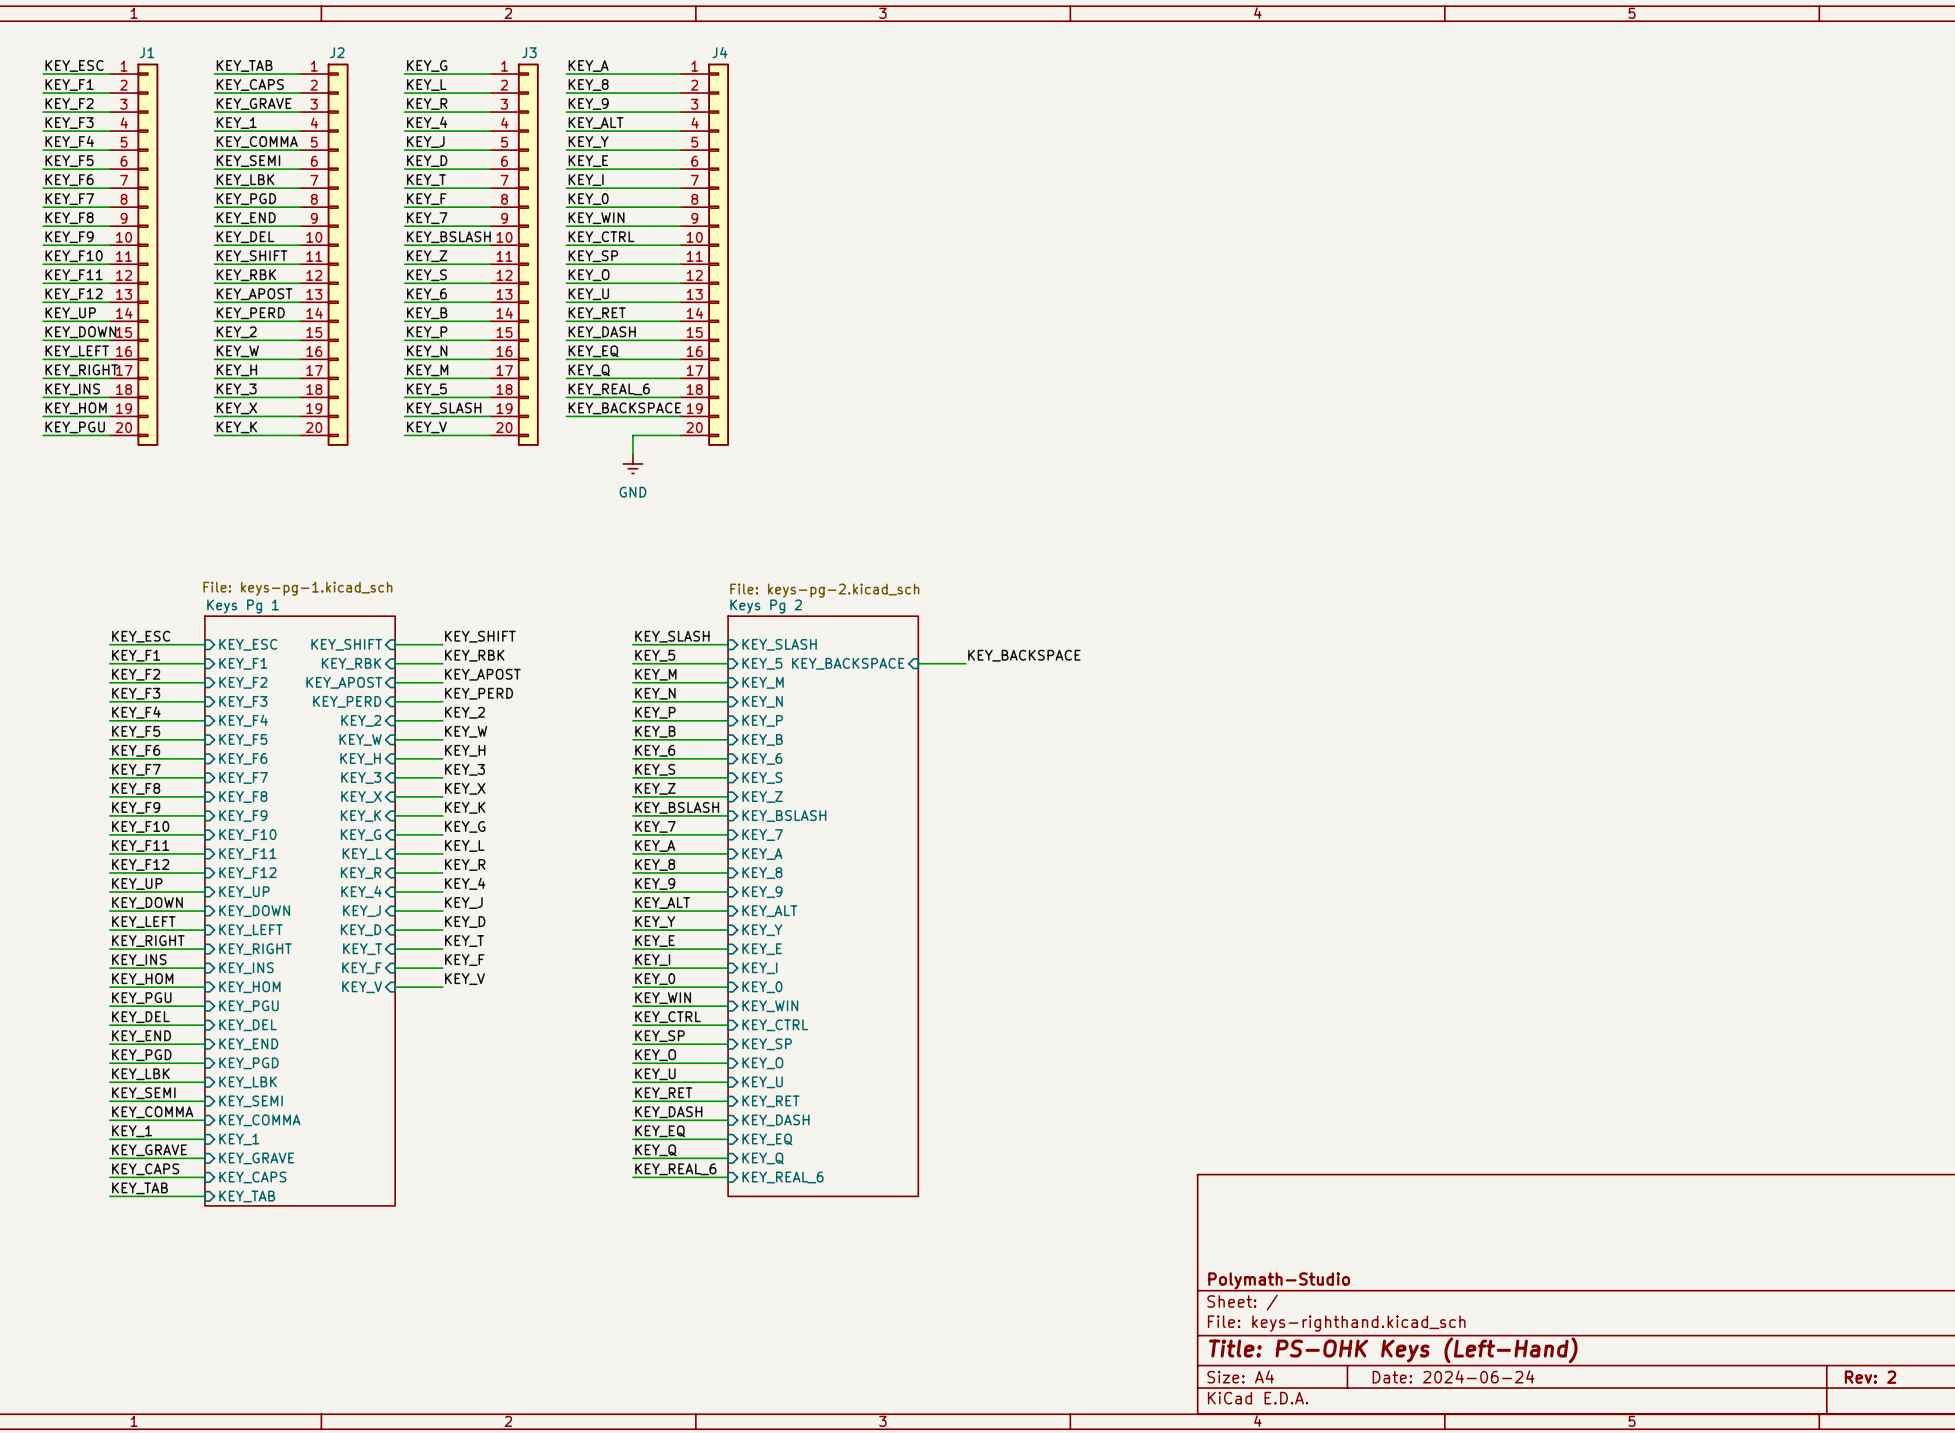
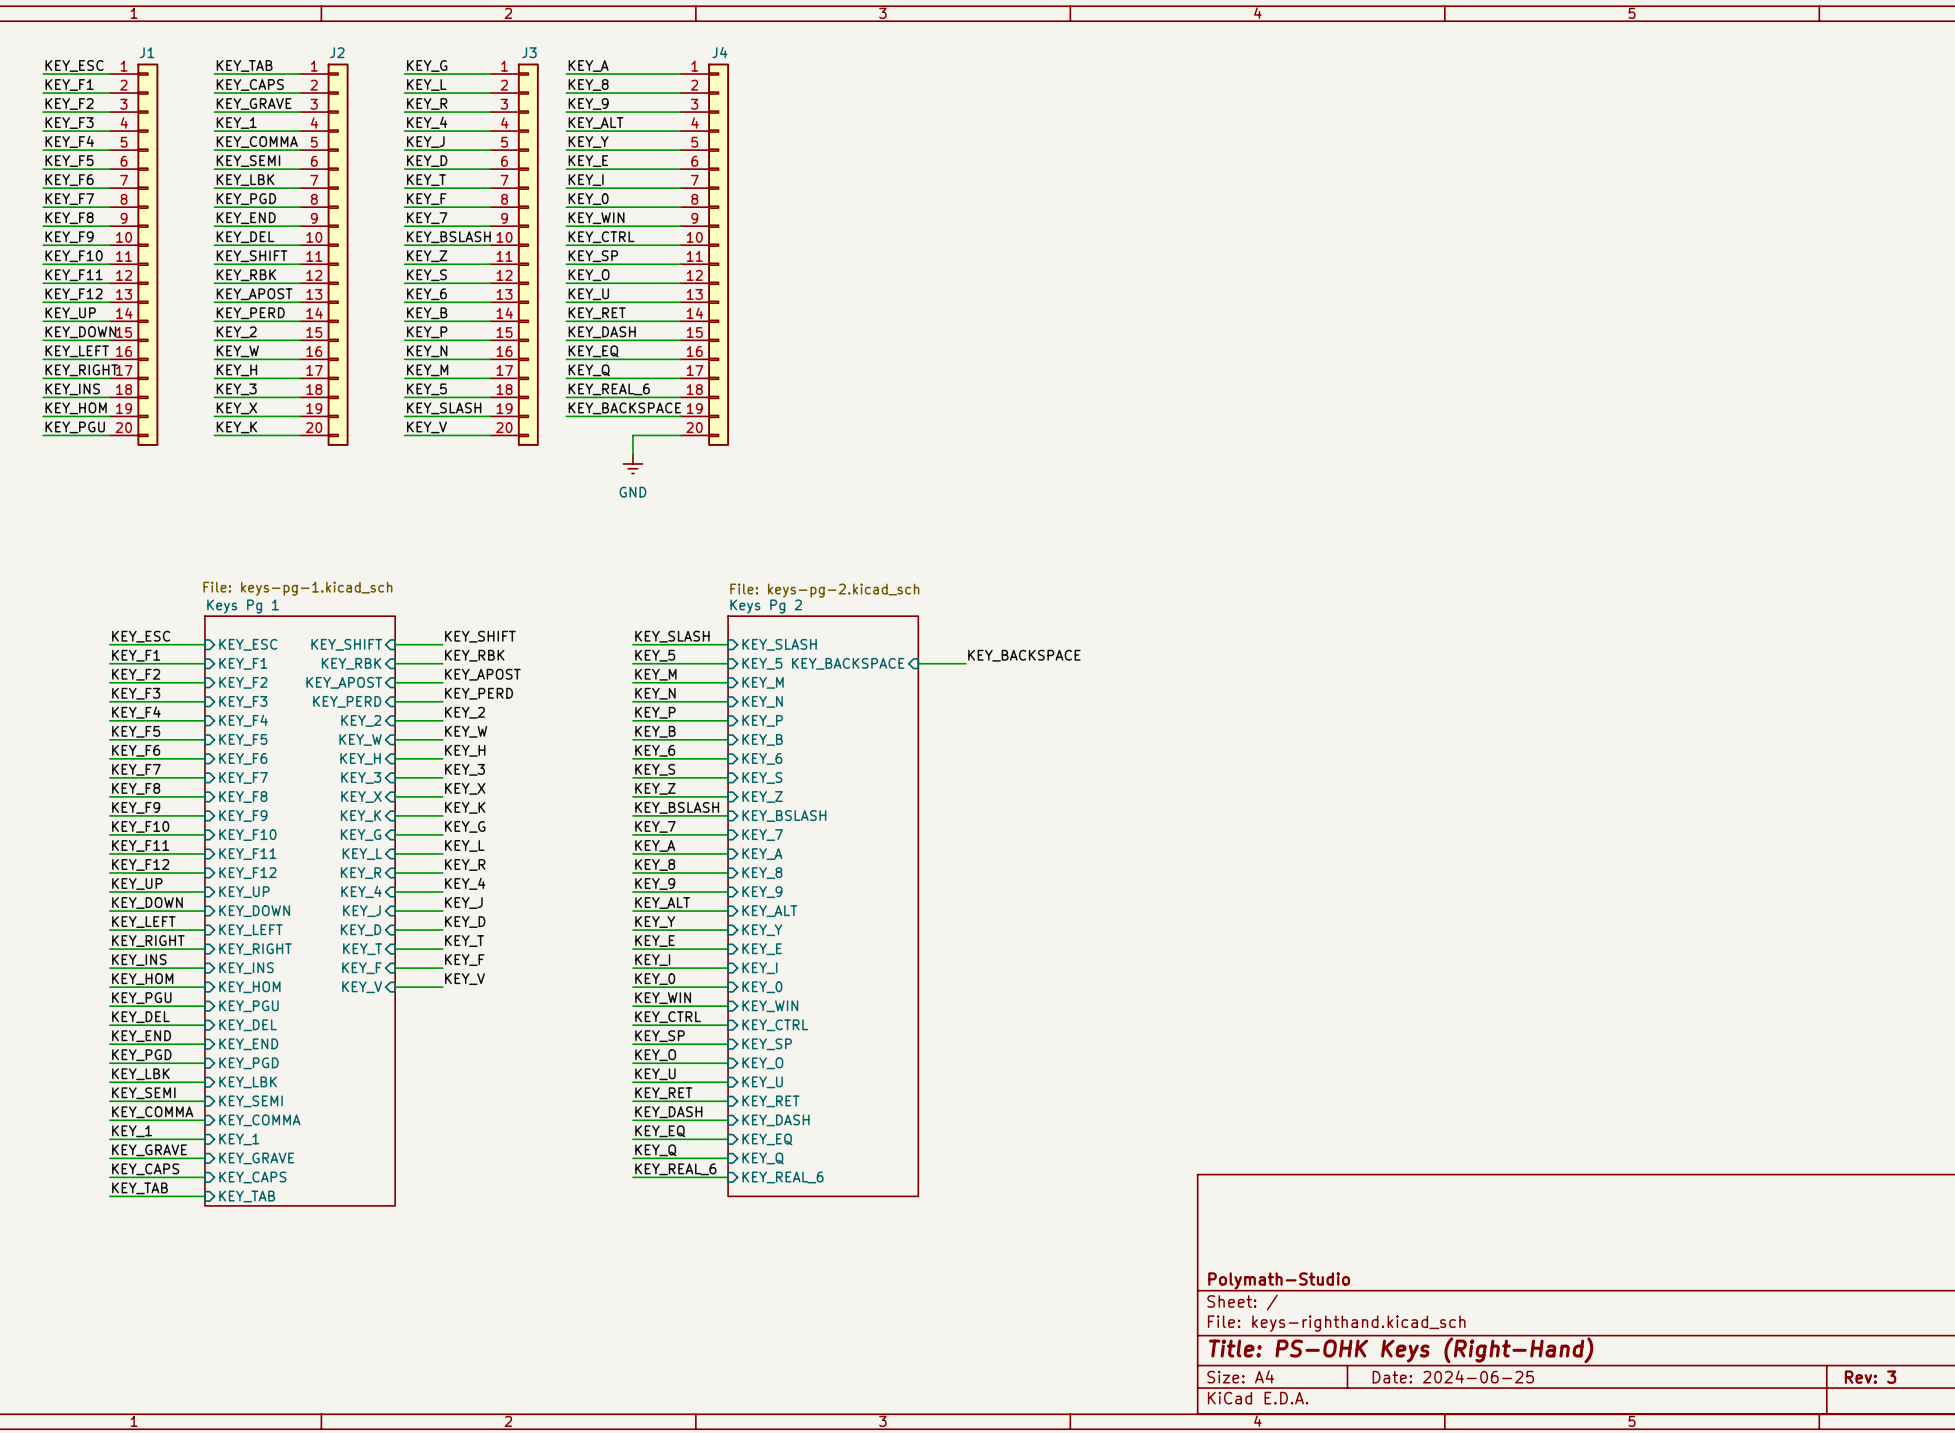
title block: Title: PS-OHK Keys (Left-Hand) (1393, 1350) -> Title: PS-OHK Keys (Right-Hand) (1401, 1350)
title block: Date: 2024-06-24 (1453, 1376) -> Date: 2024-06-25 (1453, 1376)
title block: Rev: 2 (1870, 1377) -> Rev: 3 (1870, 1377)

